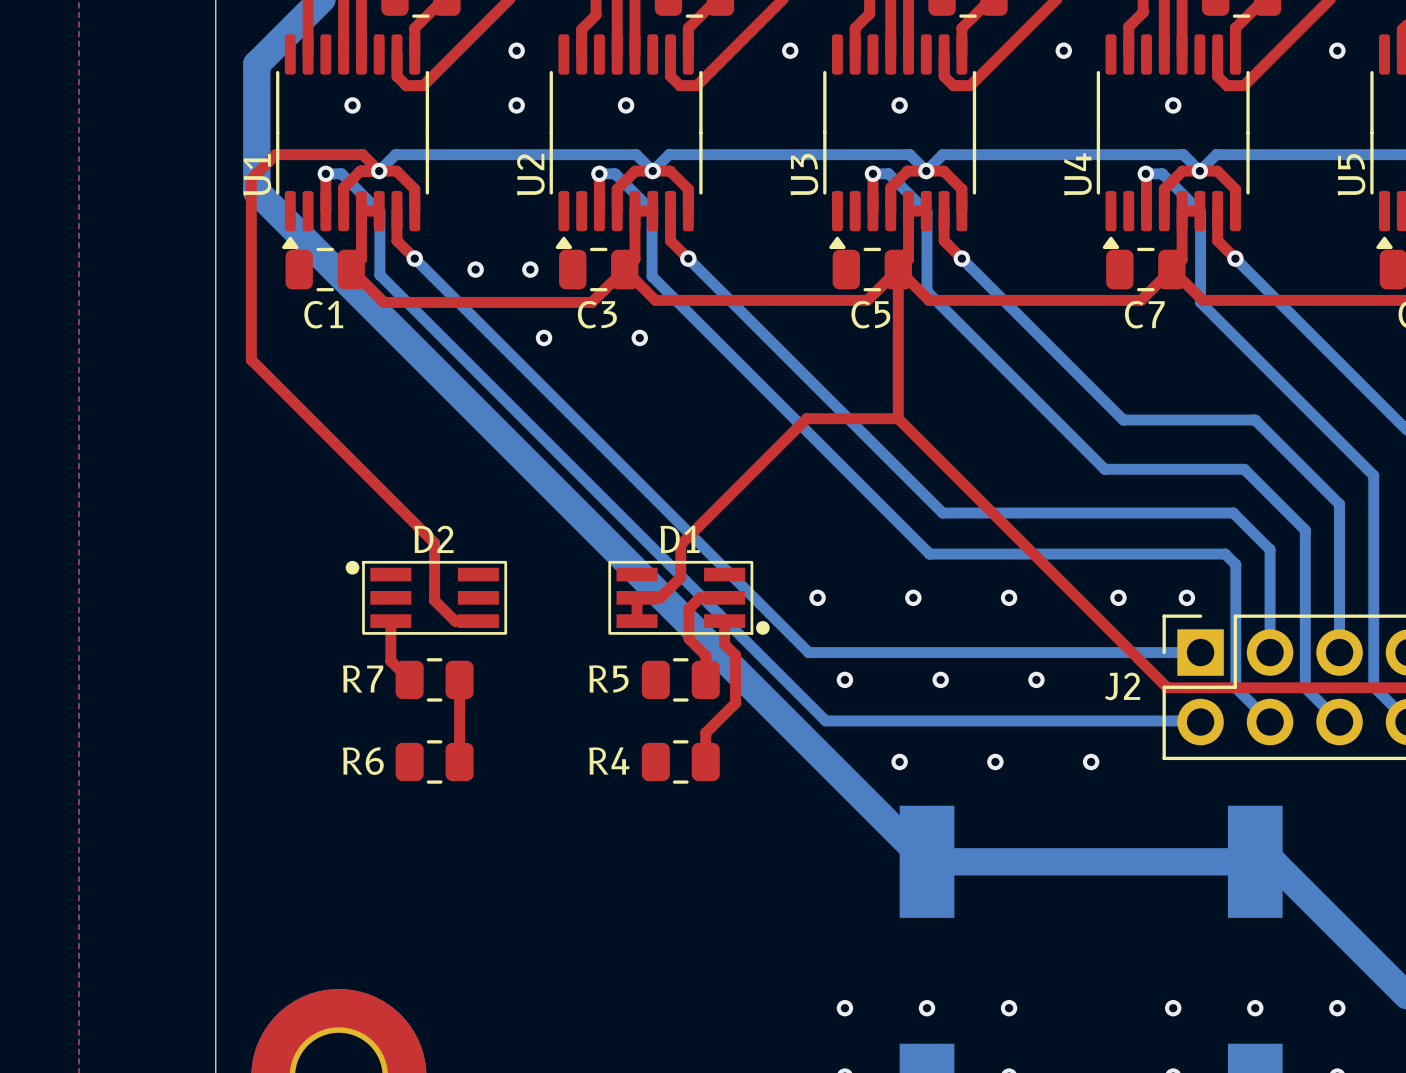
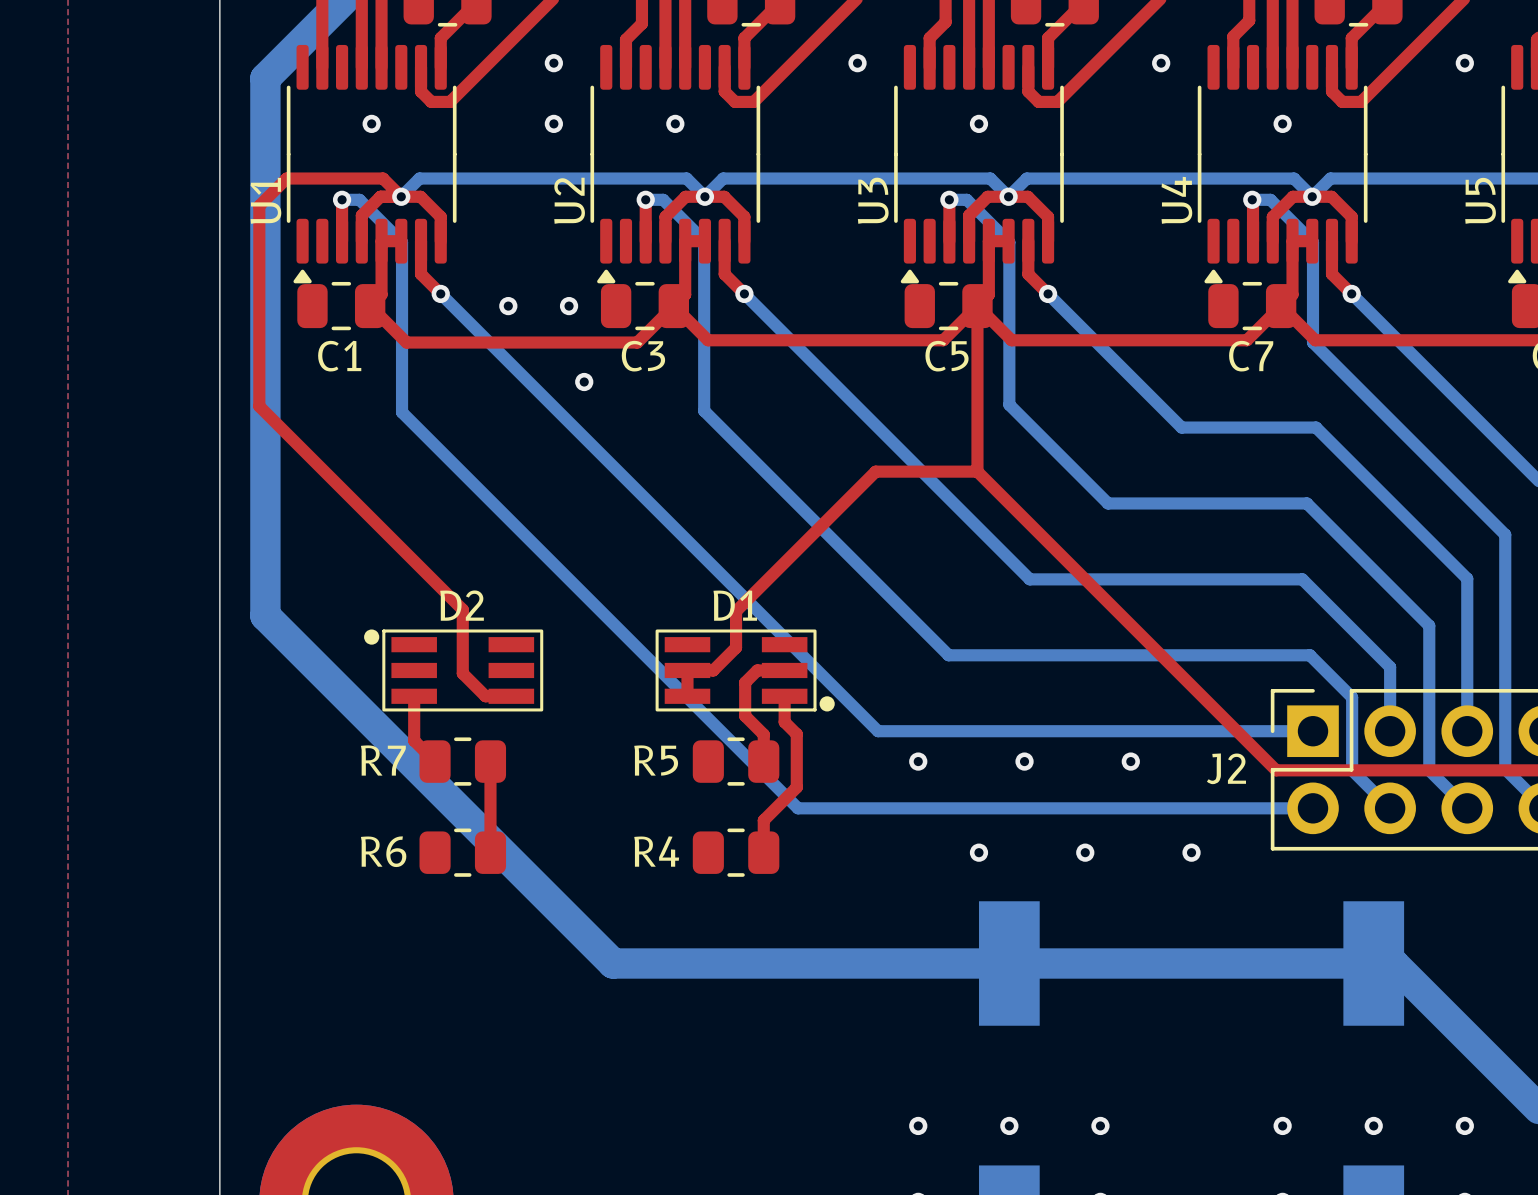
bottom track: (256, 191) (927, 861) -> (265, 219) (265, 615) (613, 963) (1009, 963)
bottom track: (379, 275) (825, 720) (1200, 722) -> (402, 312) (402, 412) (798, 808) (1313, 808)
bottom track: (652, 276) (929, 554) (1225, 554) (1235, 564) (1235, 622) -> (704, 313) (704, 410) (948, 655) (1309, 655) (1352, 697)
bottom track: (927, 291) (1104, 469) (1244, 469) (1305, 530) (1305, 557) -> (1009, 330) (1009, 404) (1108, 503) (1306, 503) (1429, 625)
via: (639, 337) -> none
bottom track: (1082, 378) (1123, 420) (1255, 420) (1339, 504) (1339, 515) -> (1181, 427) (1316, 427) (1467, 578)
bottom track: (942, 513) (1233, 513) (1270, 549) (1270, 594) -> (1026, 576) (1029, 579) (1302, 579) (1390, 667)
via: (817, 597) -> none
via: (913, 597) -> none
via: (1009, 597) -> none
via: (1118, 597) -> none
via: (1186, 597) -> none

